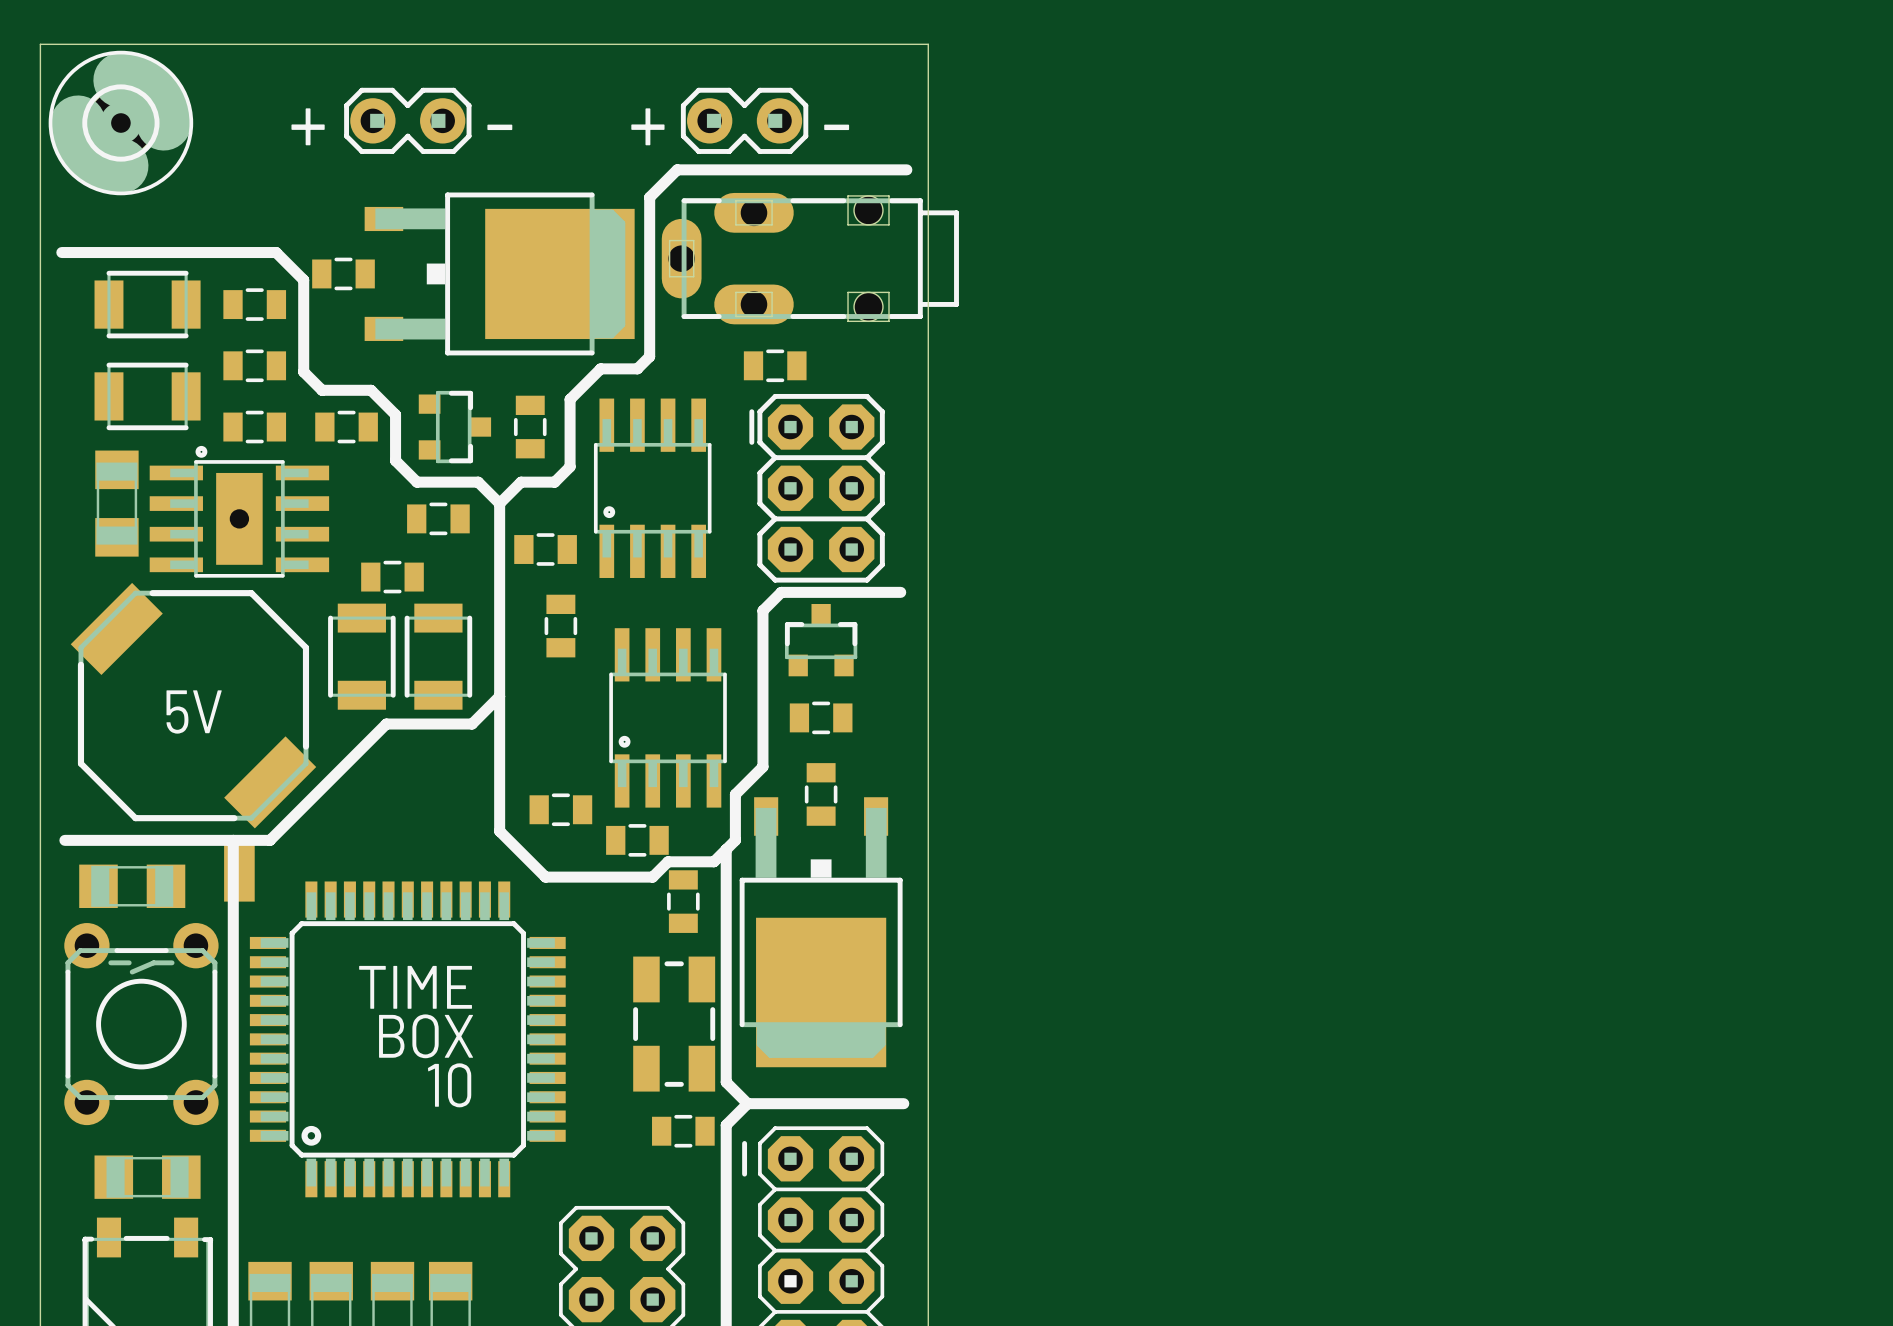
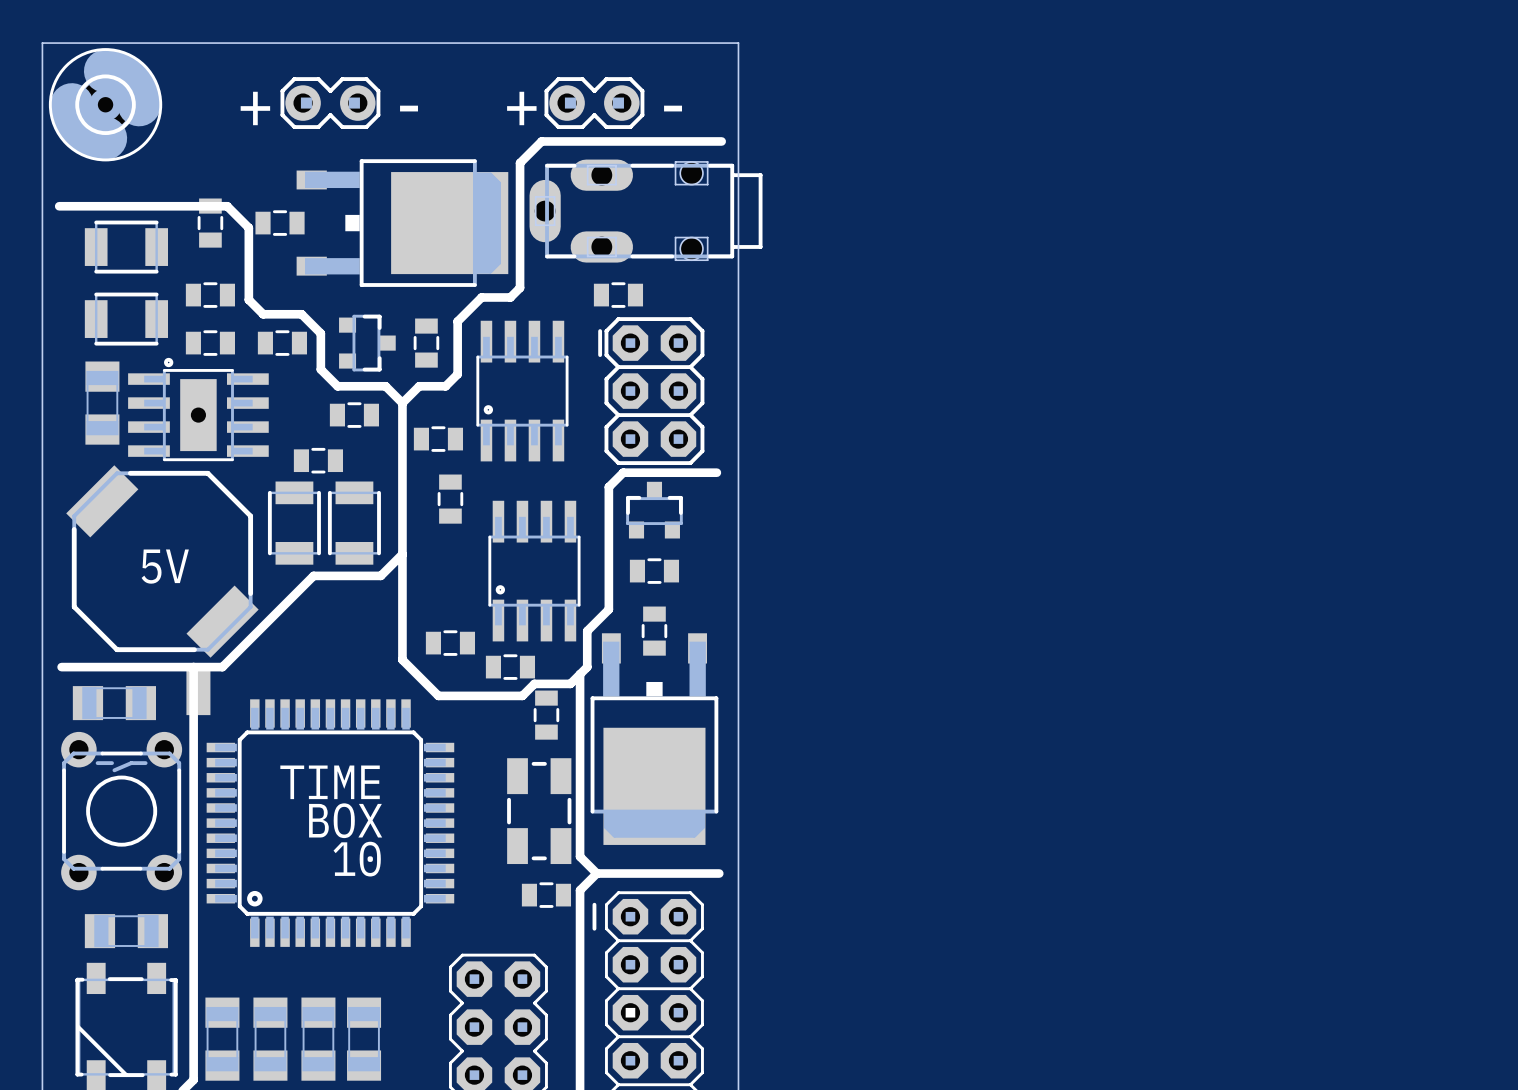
part rotation: 0° (254, 304) -> 90° clockwise (210, 223)

